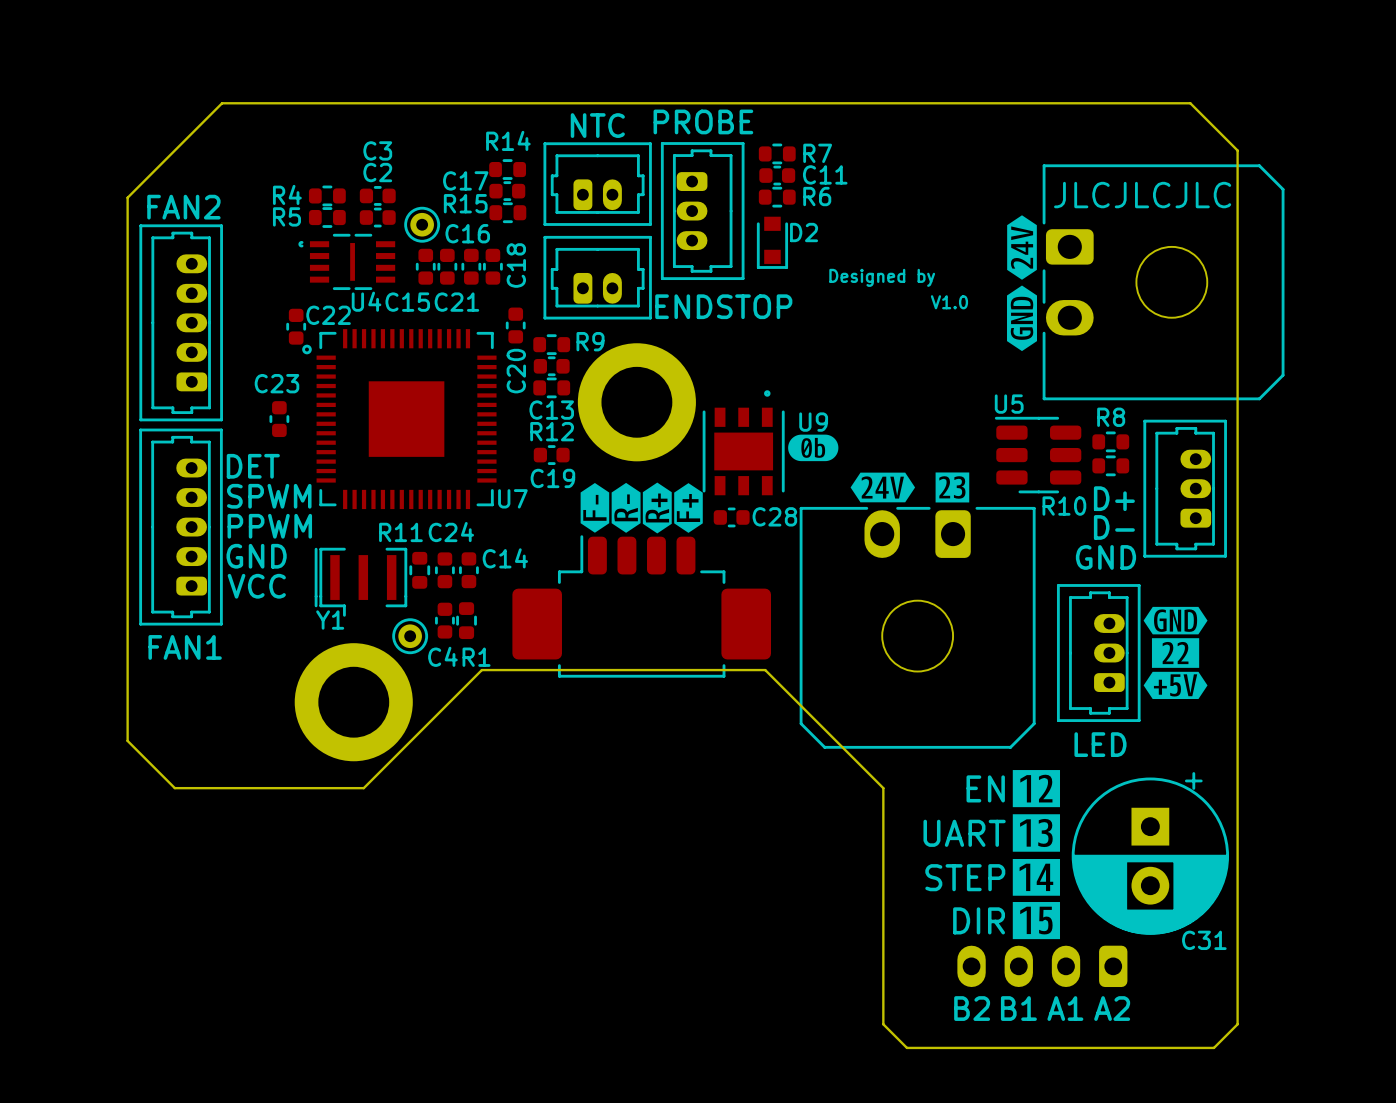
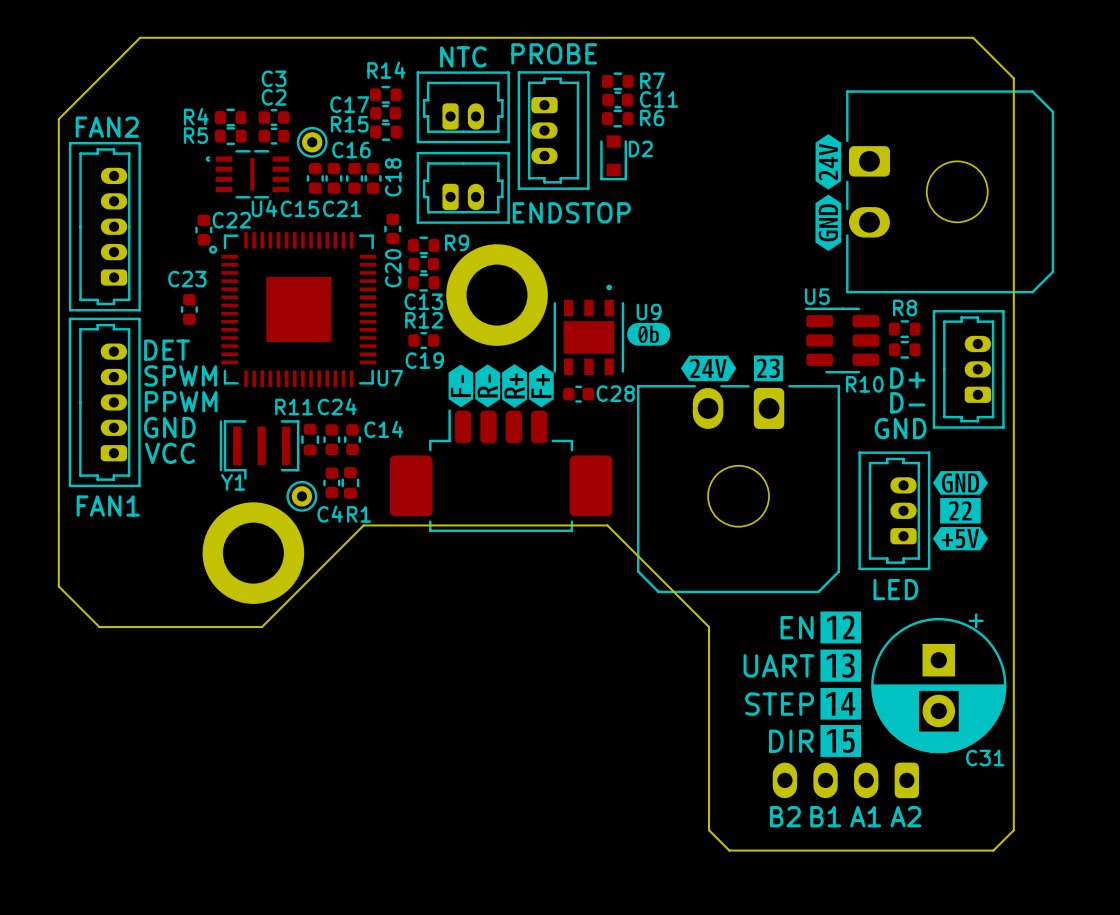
text: JLCJLCJLC (1142, 195) -> none
text: Designed by (882, 277) -> none
text: V1.0 (949, 302) -> none

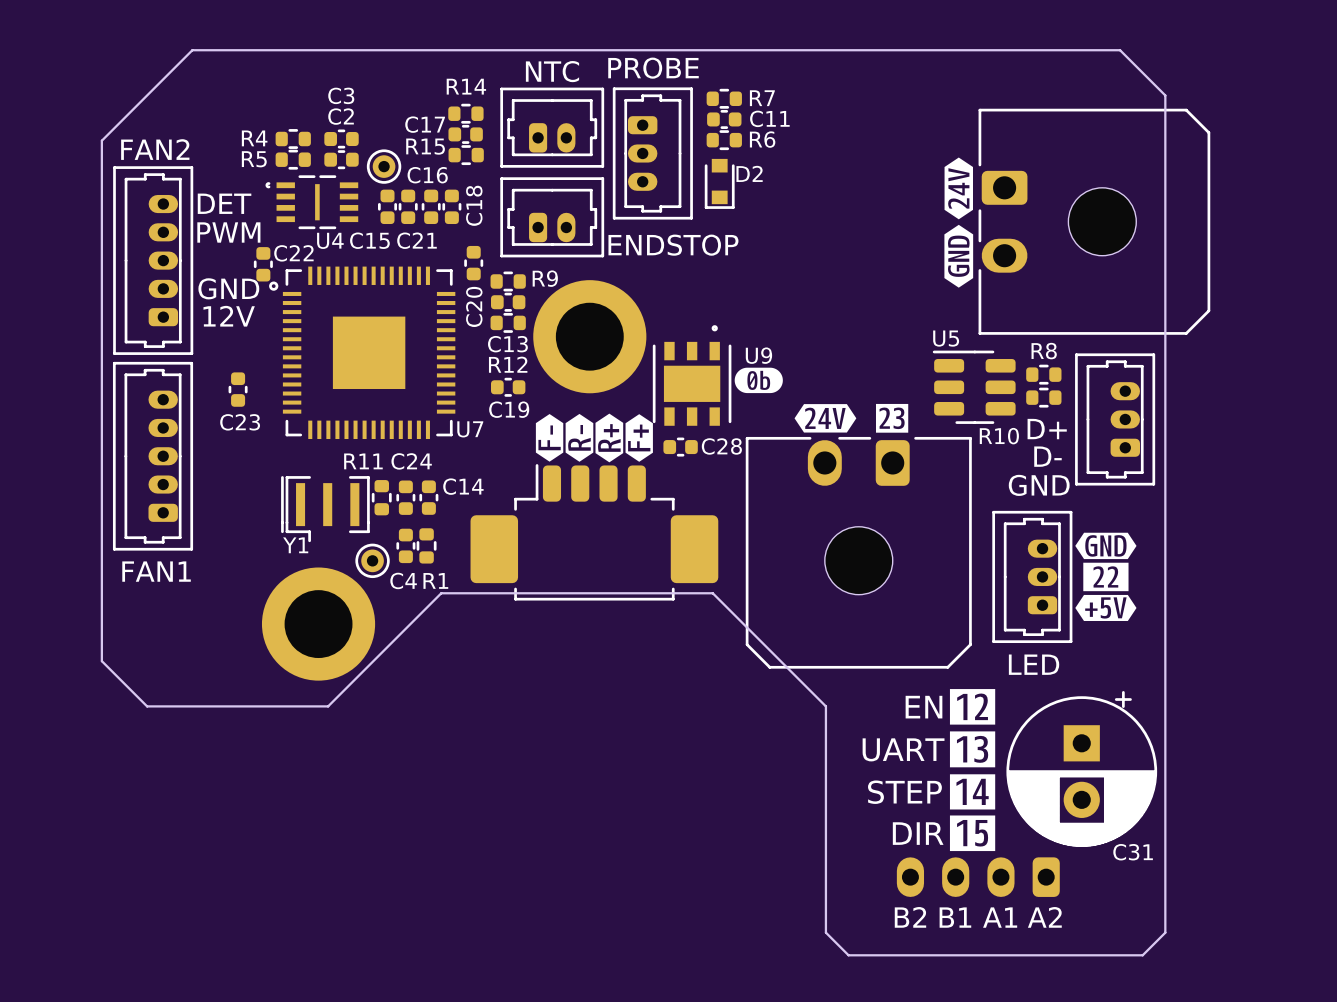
text: none -> PWM (228, 232)
text: none -> 12V (229, 316)
C23 name position: C23 (187, 279) -> C23 (240, 422)
C23 position: (189, 309) -> (238, 389)
text position: DET (166, 350) -> DET (224, 203)
text: SPWM (180, 375) -> none
text: PPWM (181, 401) -> none
text position: GND (169, 427) -> GND (228, 288)
text: VCC (169, 453) -> none

